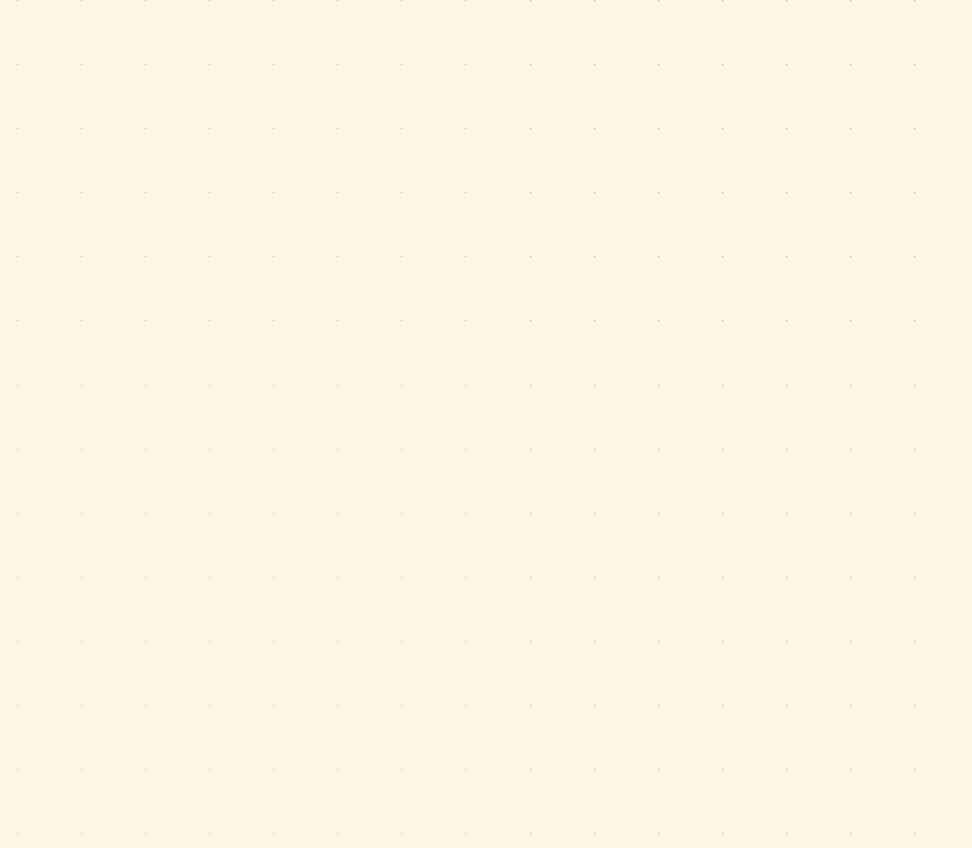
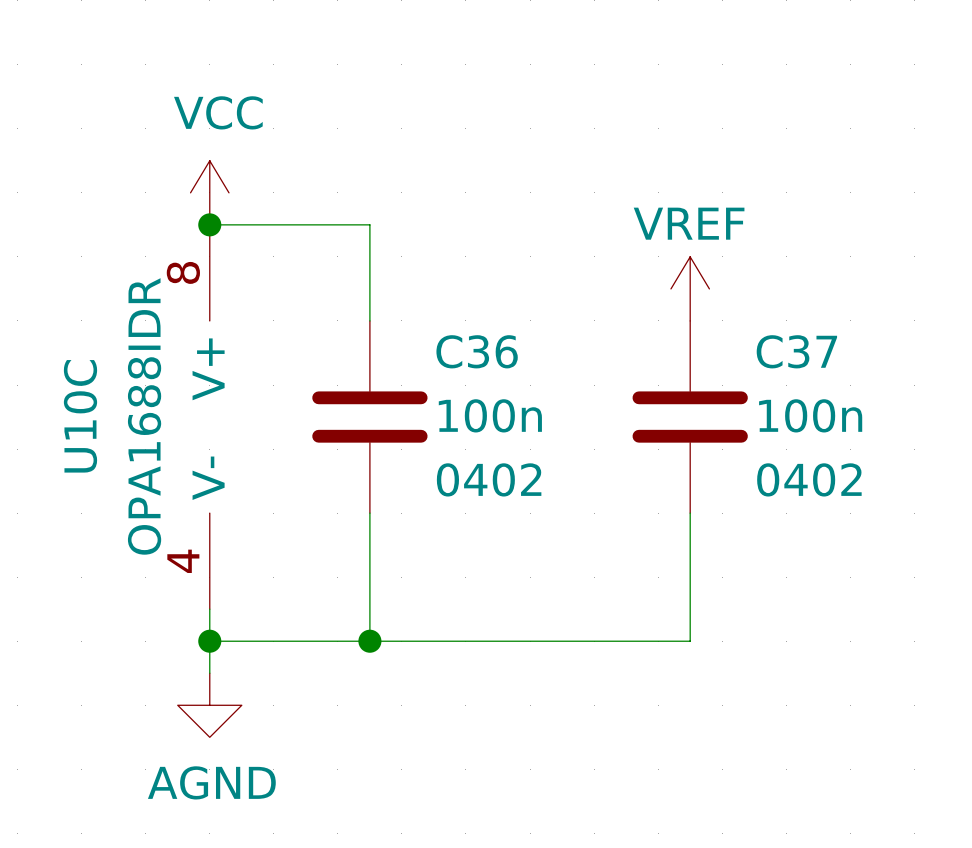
power symbol: none -> VCC (209, 192)
wire: none -> (209, 224) (369, 224) (369, 320)
junction: none -> (209, 224)
power symbol: none -> VREF (690, 288)
U10C: none -> (209, 417)
C36: none -> (369, 417)
C37: none -> (690, 417)
wire: none -> (369, 513) (369, 641)
wire: none -> (690, 513) (690, 641) (209, 641)
wire: none -> (209, 609) (209, 673)
junction: none -> (209, 641)
junction: none -> (369, 641)
power symbol: none -> AGND (209, 705)

